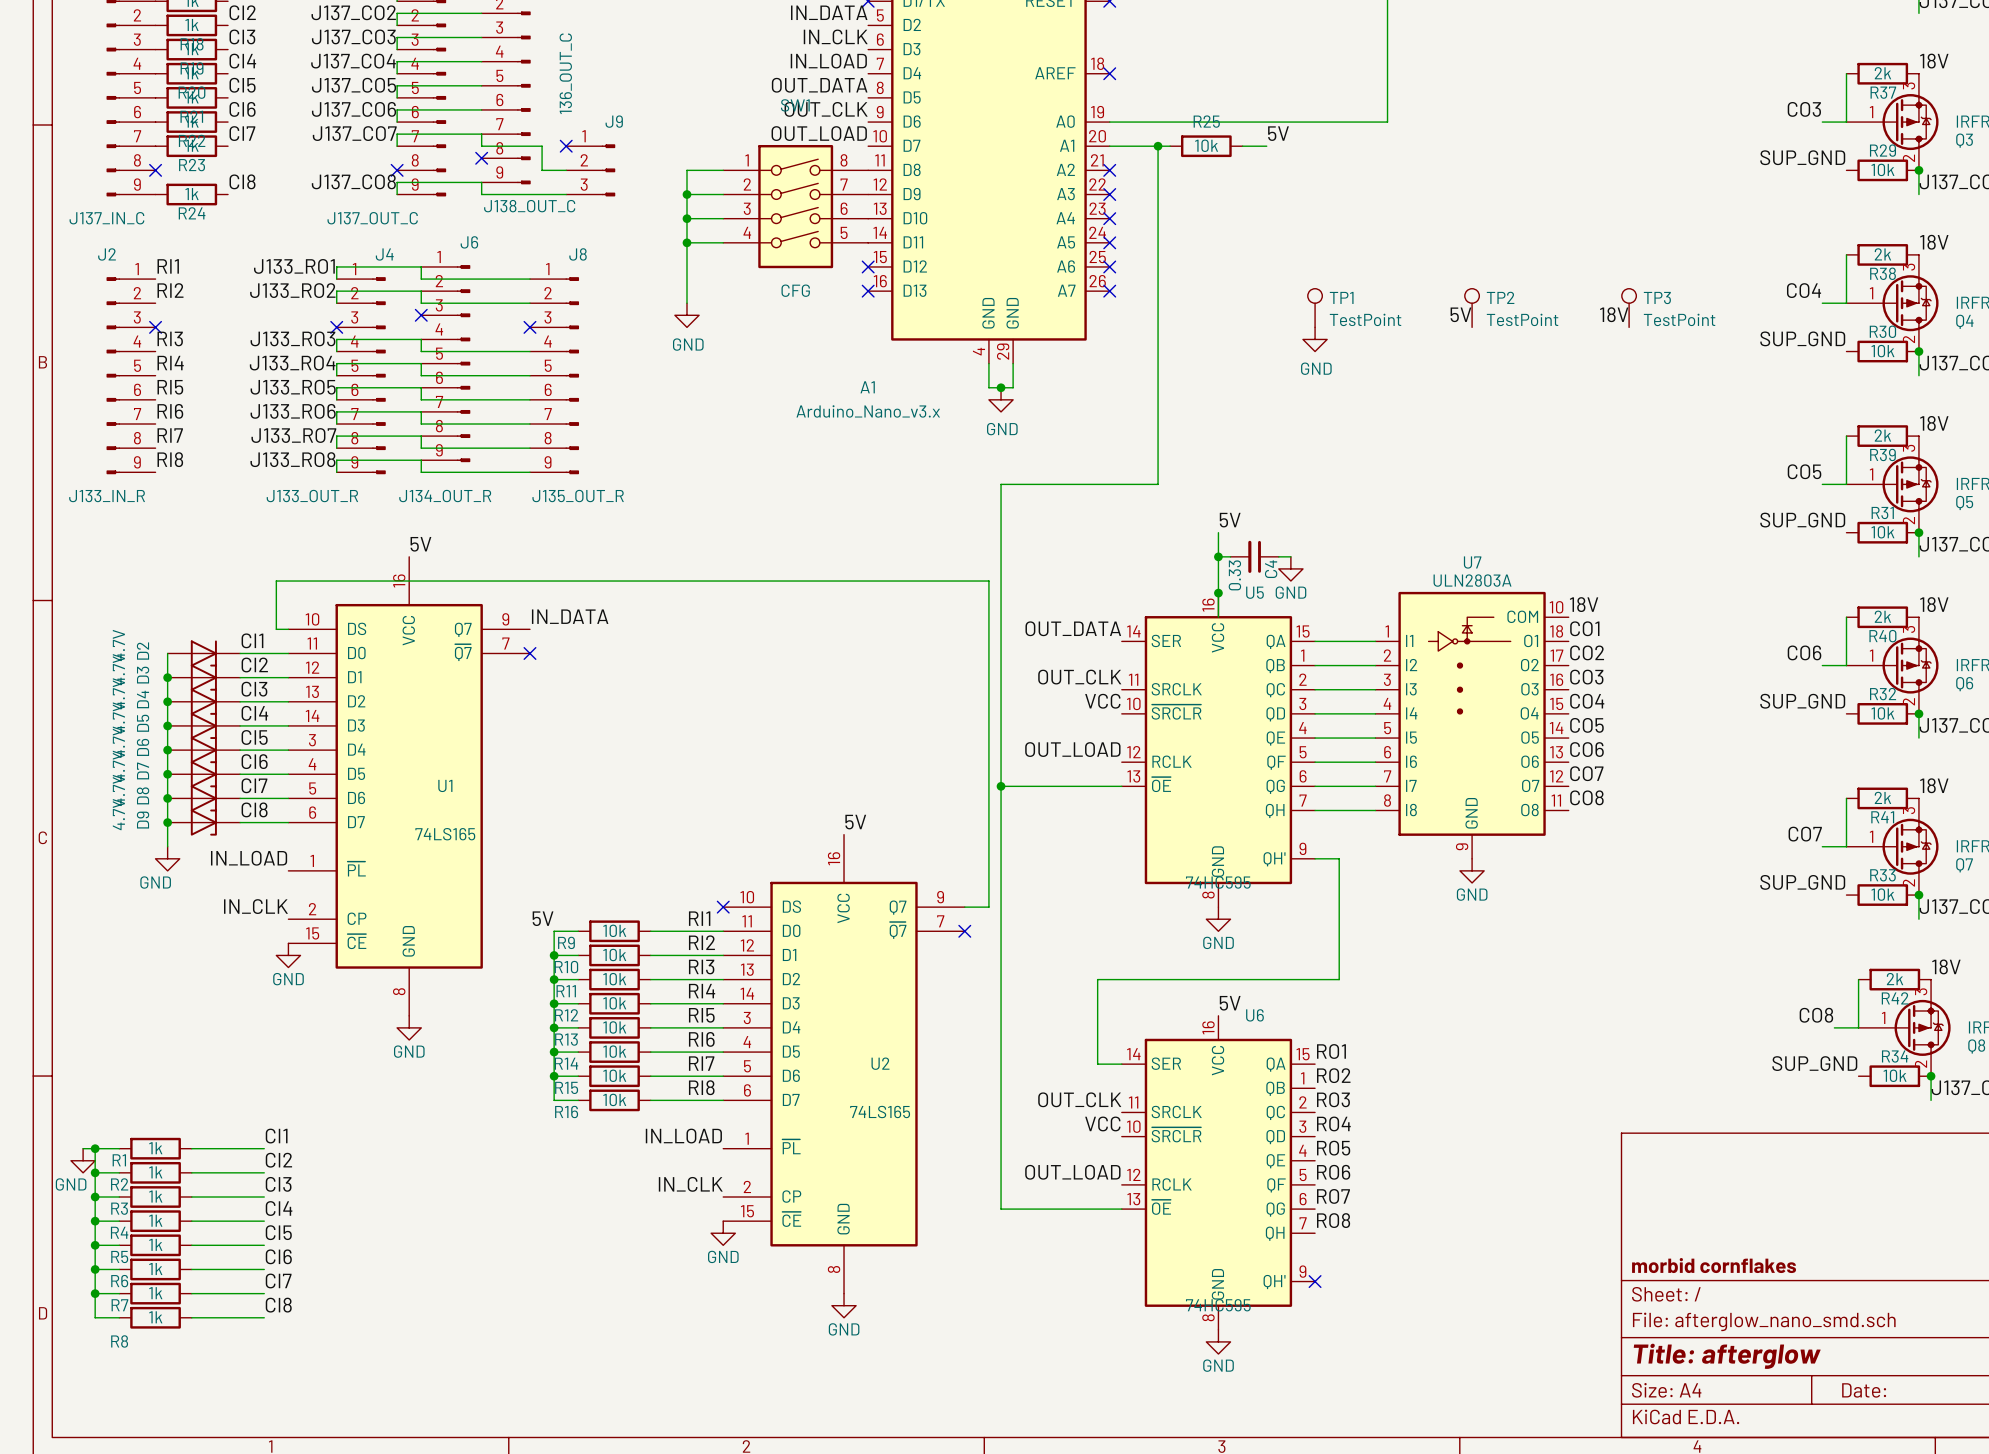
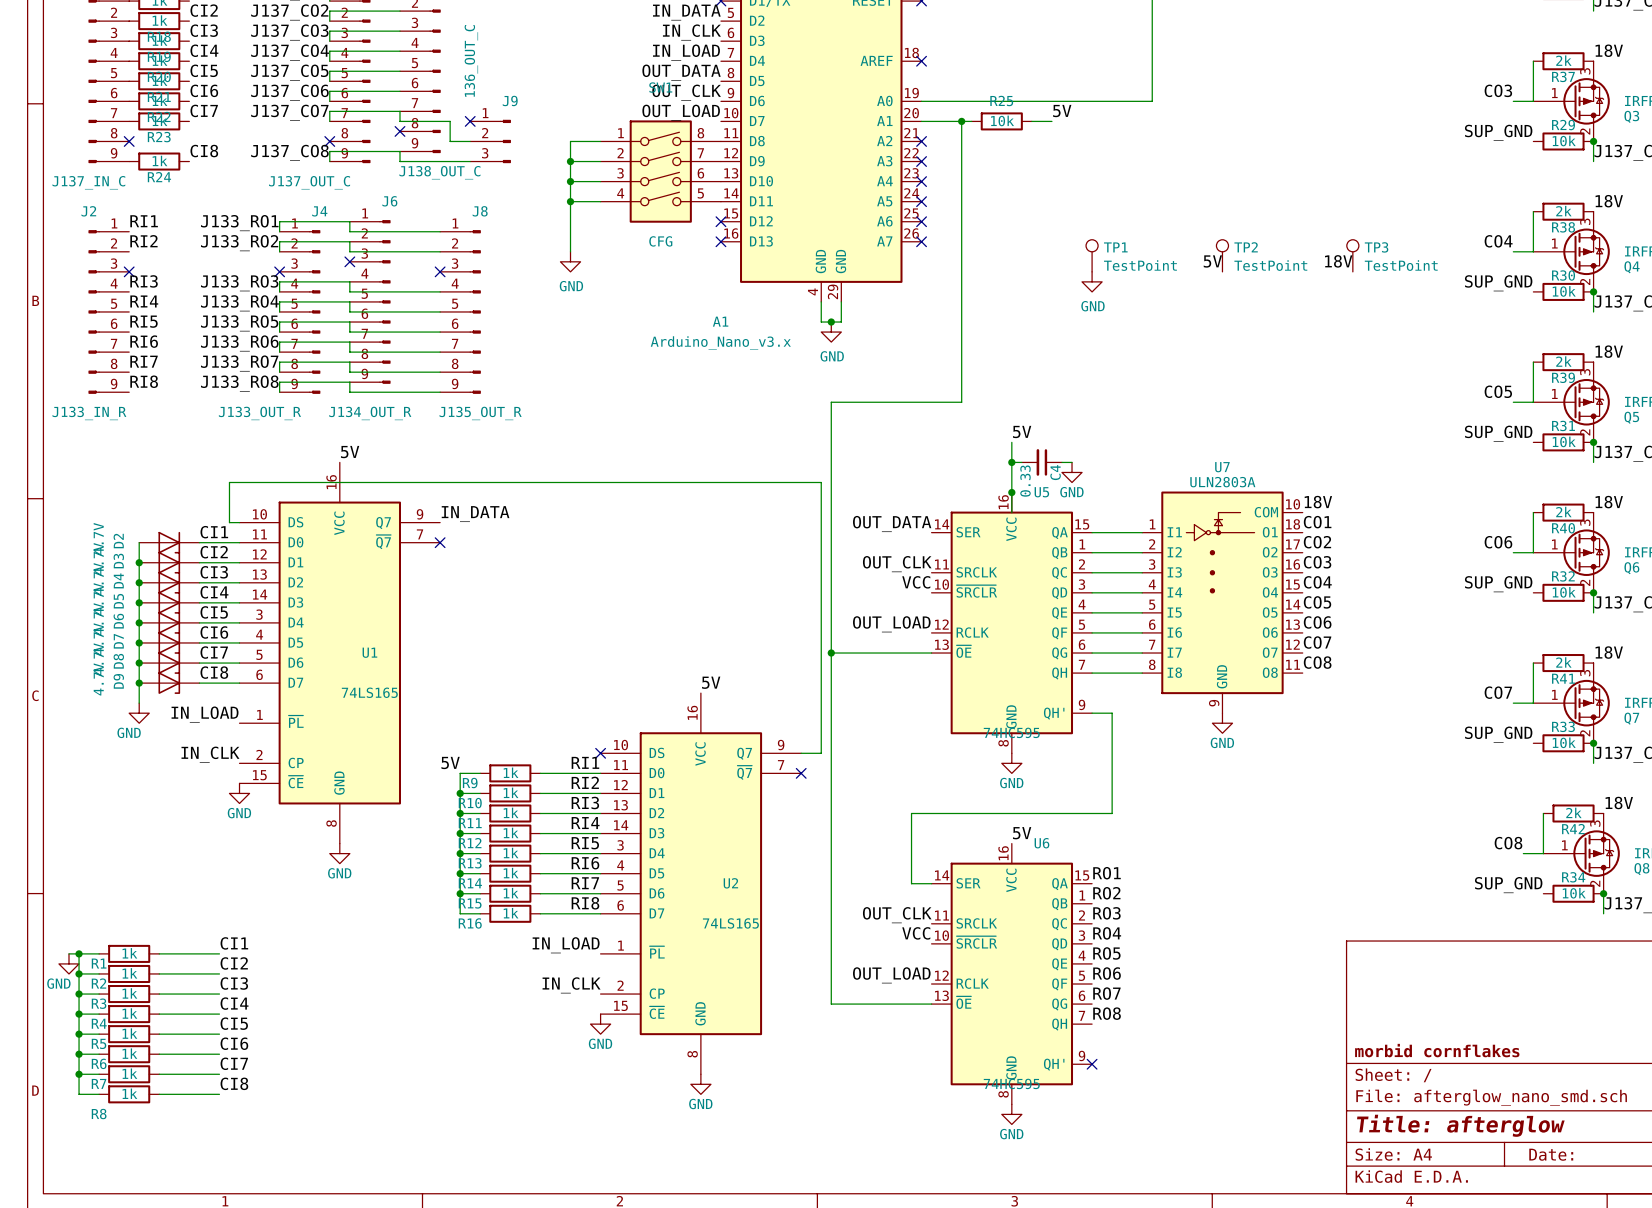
R9 value: 10k (614, 930) -> 1k (511, 772)
R10 value: 10k (614, 954) -> 1k (511, 792)
R11 value: 10k (614, 979) -> 1k (511, 812)
R12 value: 10k (614, 1003) -> 1k (511, 832)
R13 value: 10k (614, 1027) -> 1k (511, 853)
R14 value: 10k (614, 1051) -> 1k (511, 873)
R15 value: 10k (614, 1075) -> 1k (511, 893)
R16 value: 10k (614, 1099) -> 1k (511, 913)

